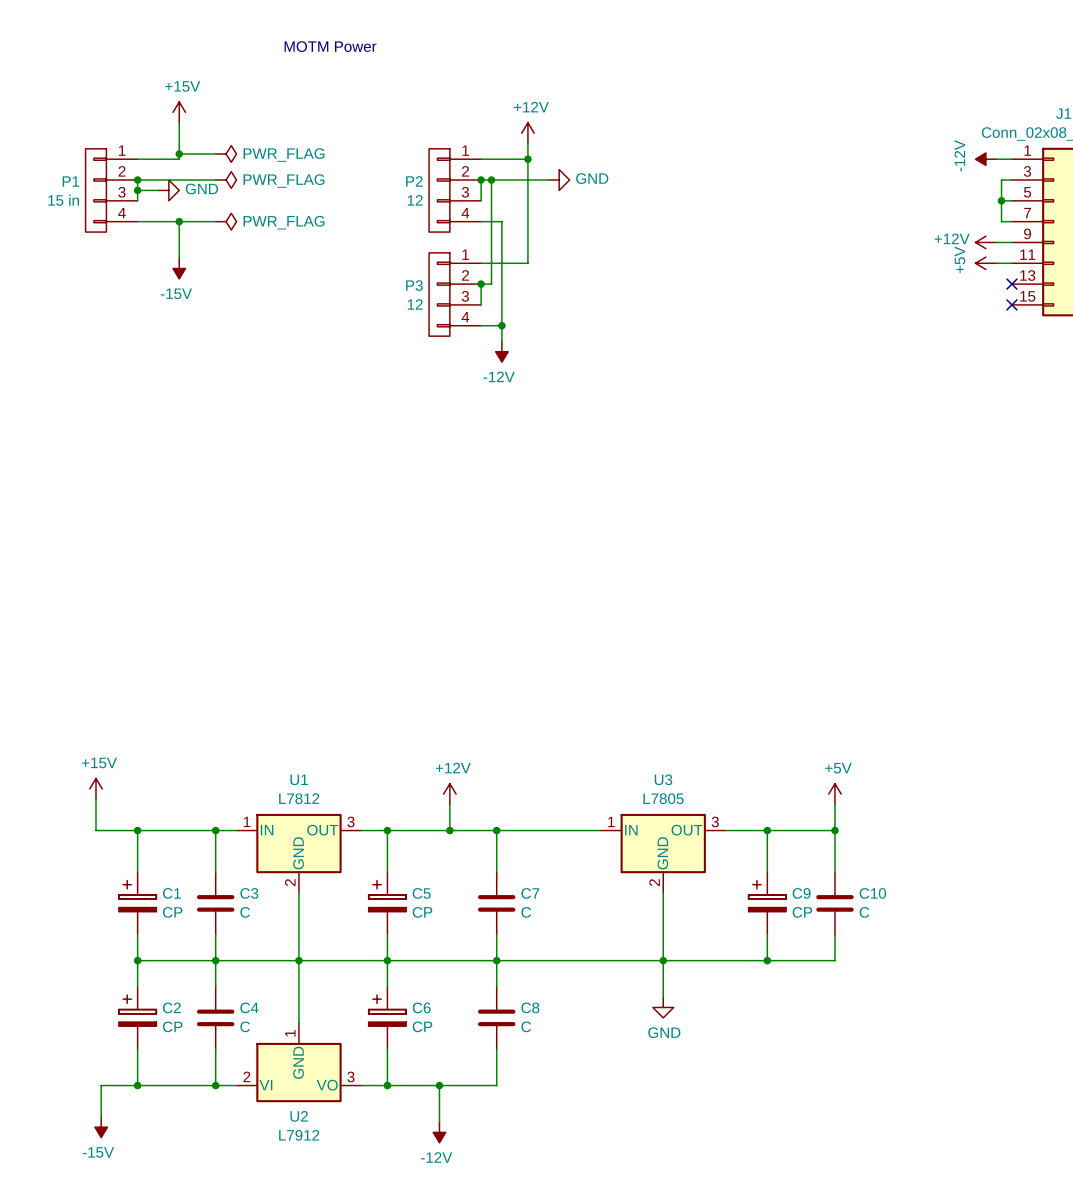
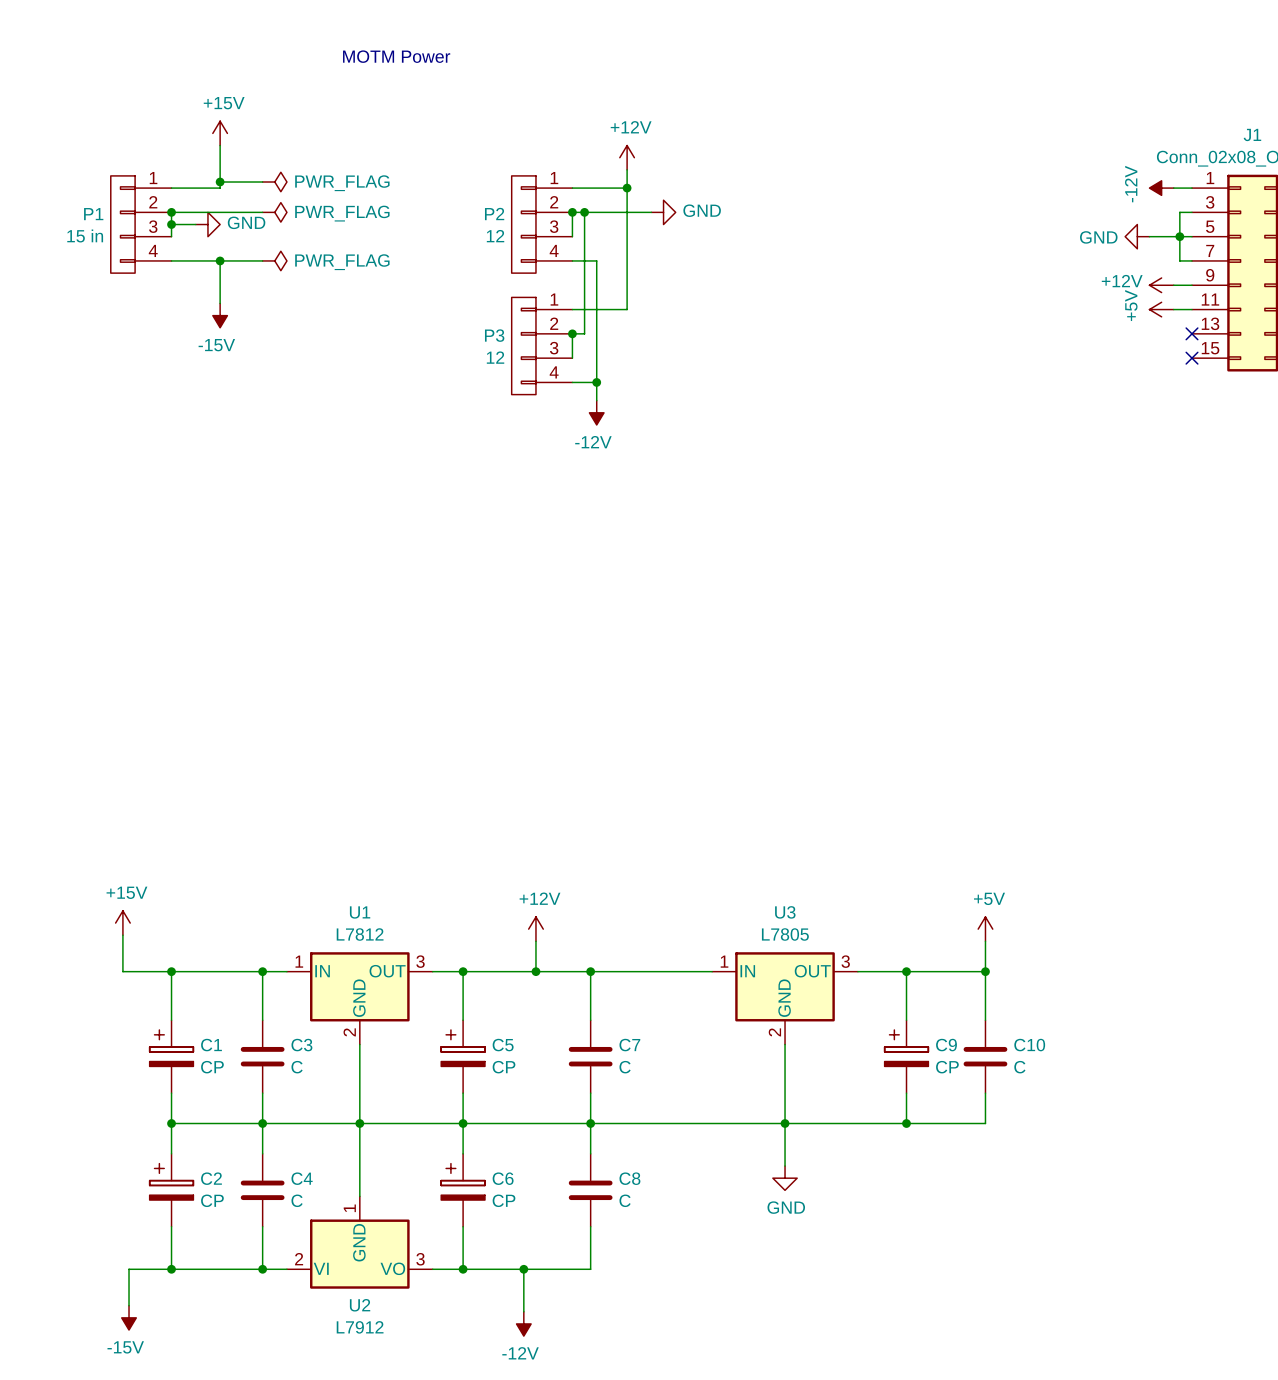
power symbol: none -> GND (1137, 236)
wire: none -> (1149, 236) (1179, 236)

